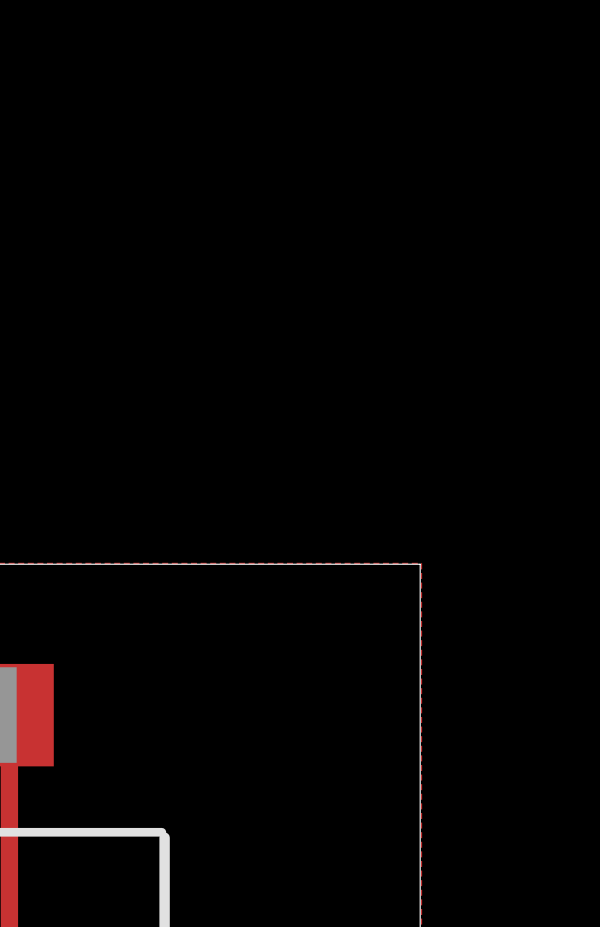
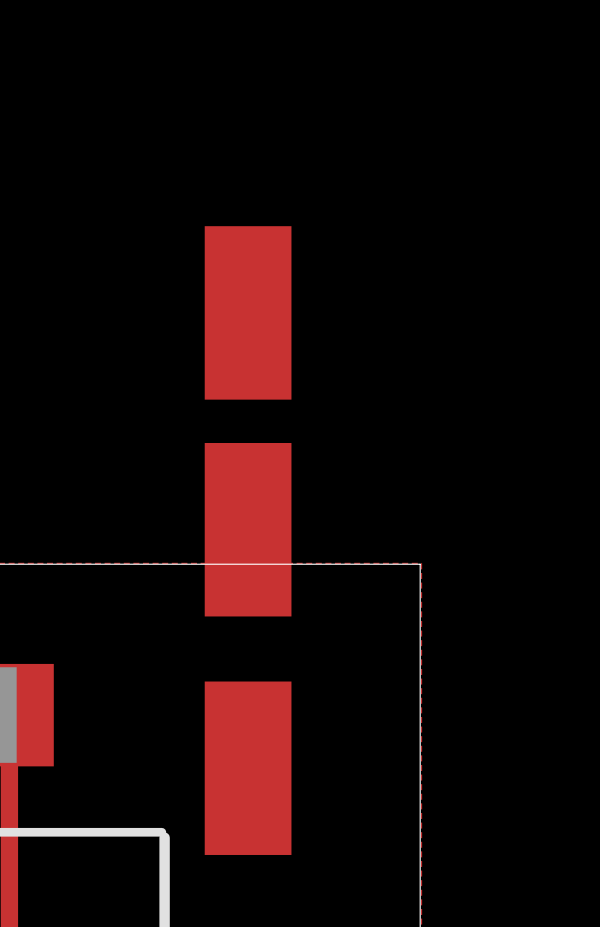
part: none -> (248, 312)
part: none -> (248, 529)
part: none -> (248, 768)

